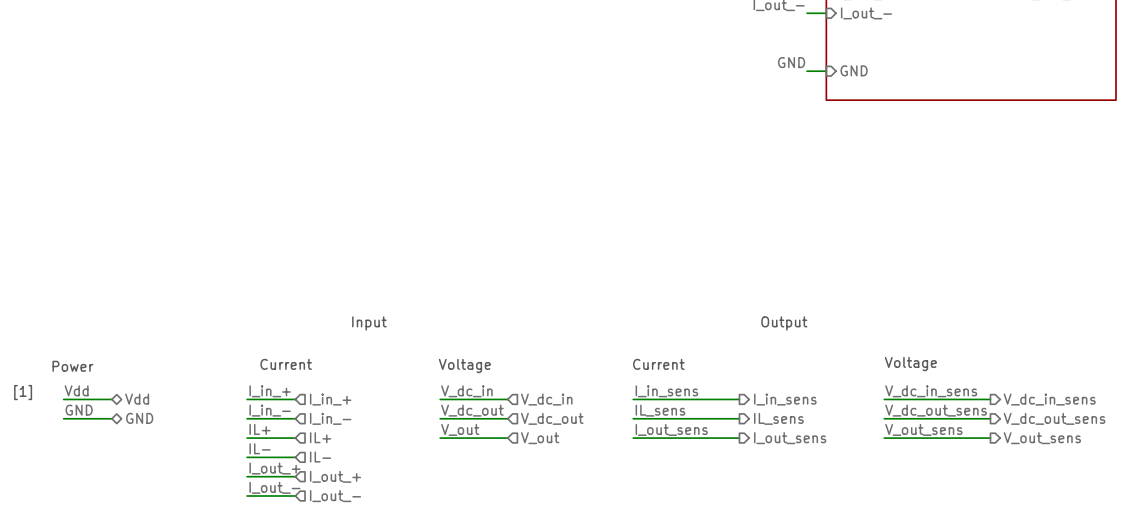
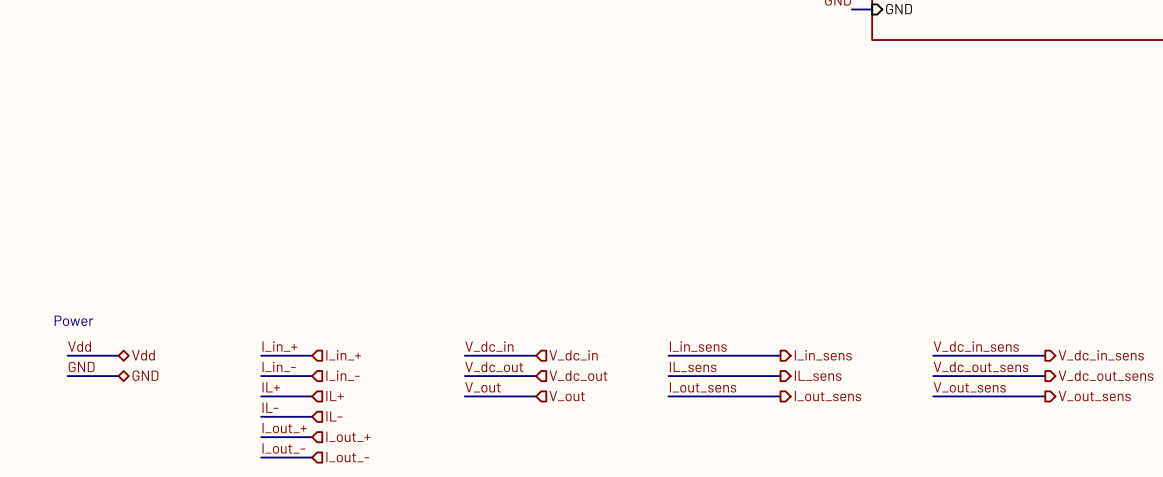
text: Input (369, 323) -> none
text: Output (784, 323) -> none
text: Current (286, 364) -> none
text: Current (658, 364) -> none
text: Voltage (910, 364) -> none
text: Voltage (464, 365) -> none
text: [1] (23, 392) -> none

